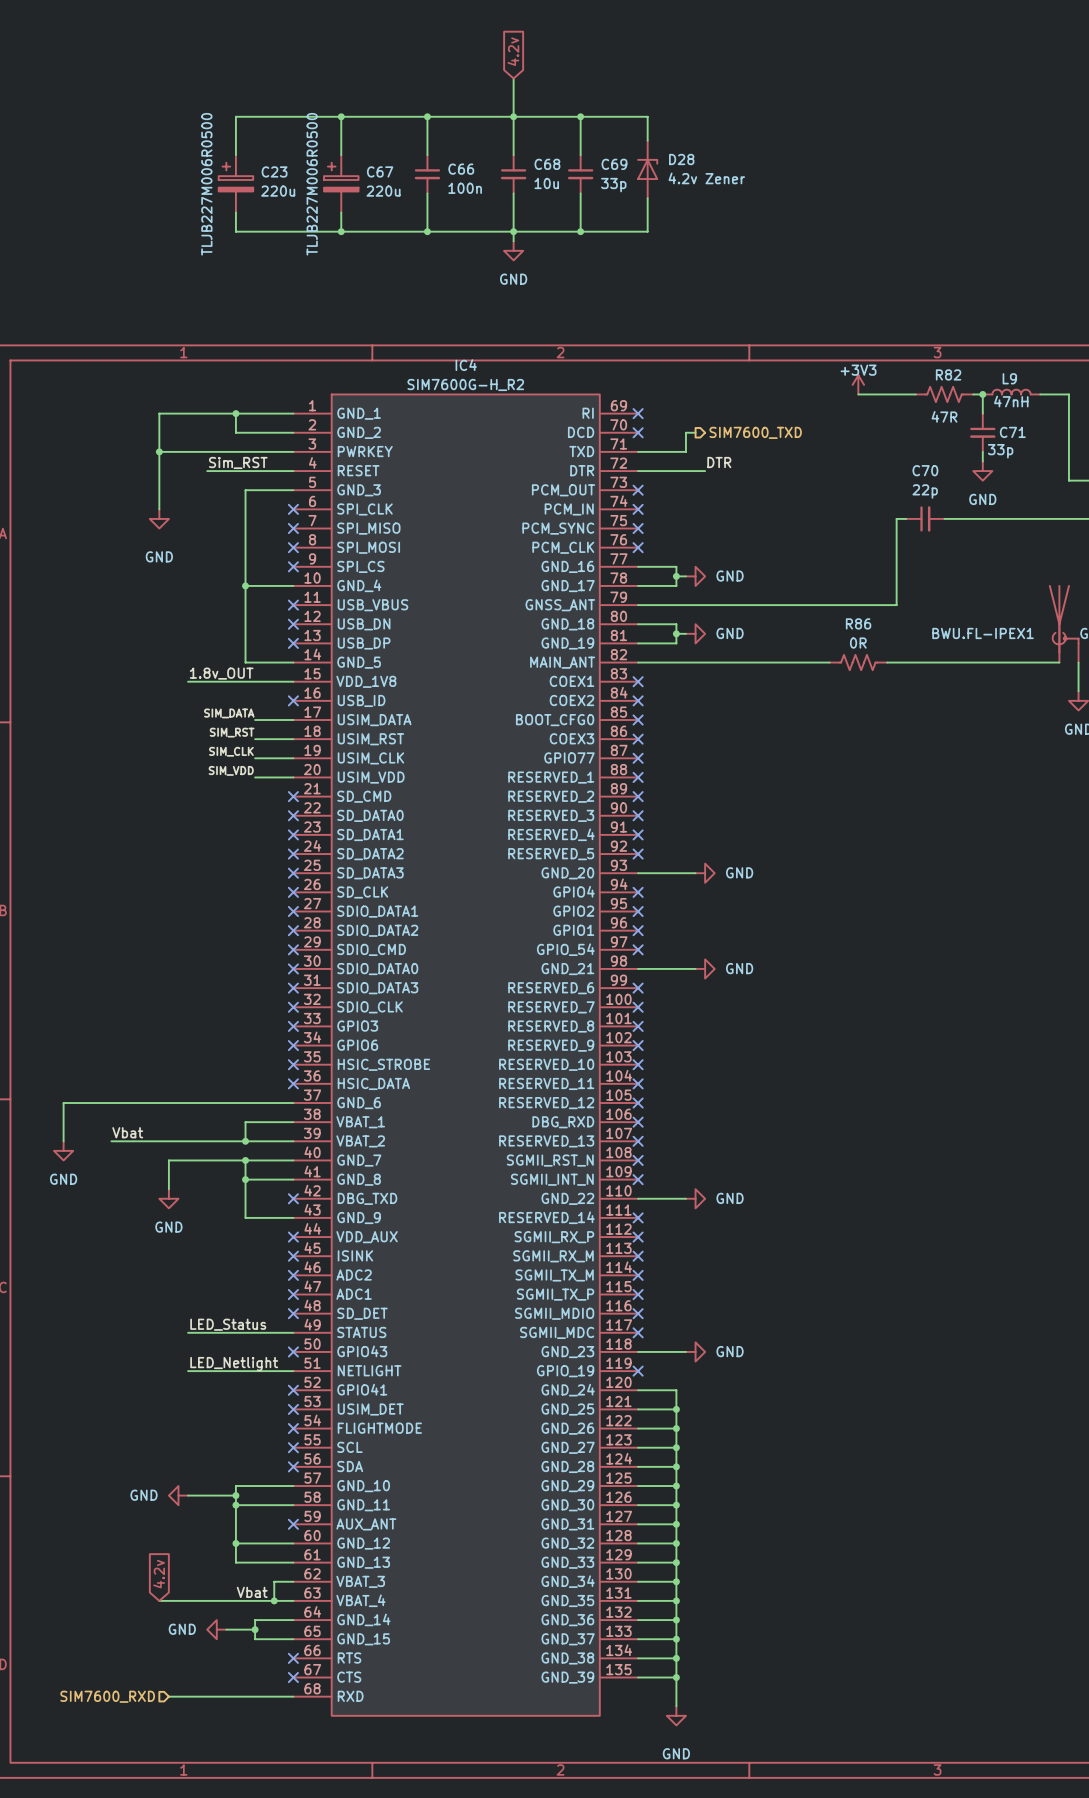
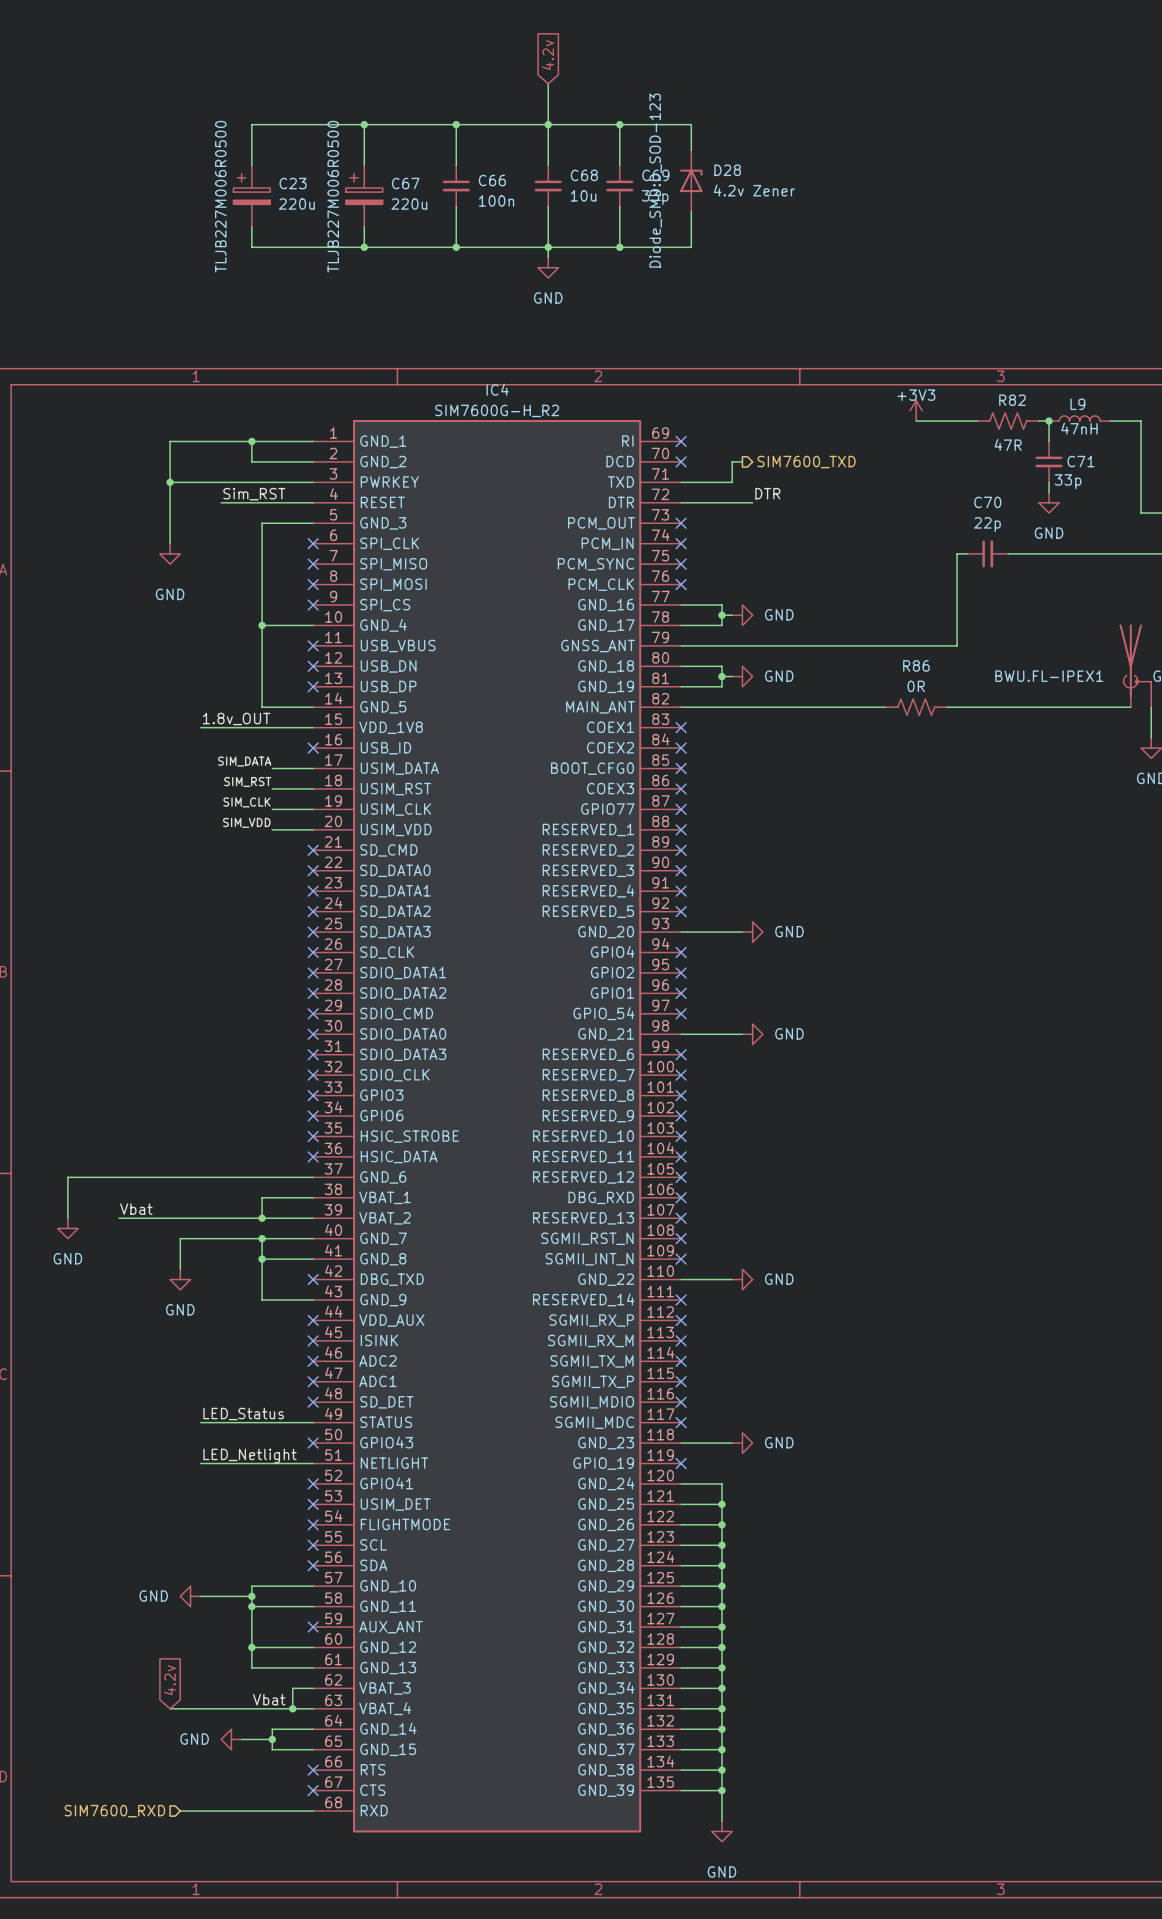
D28 text: none -> Diode_SMD:D_SOD-123 (655, 180)

